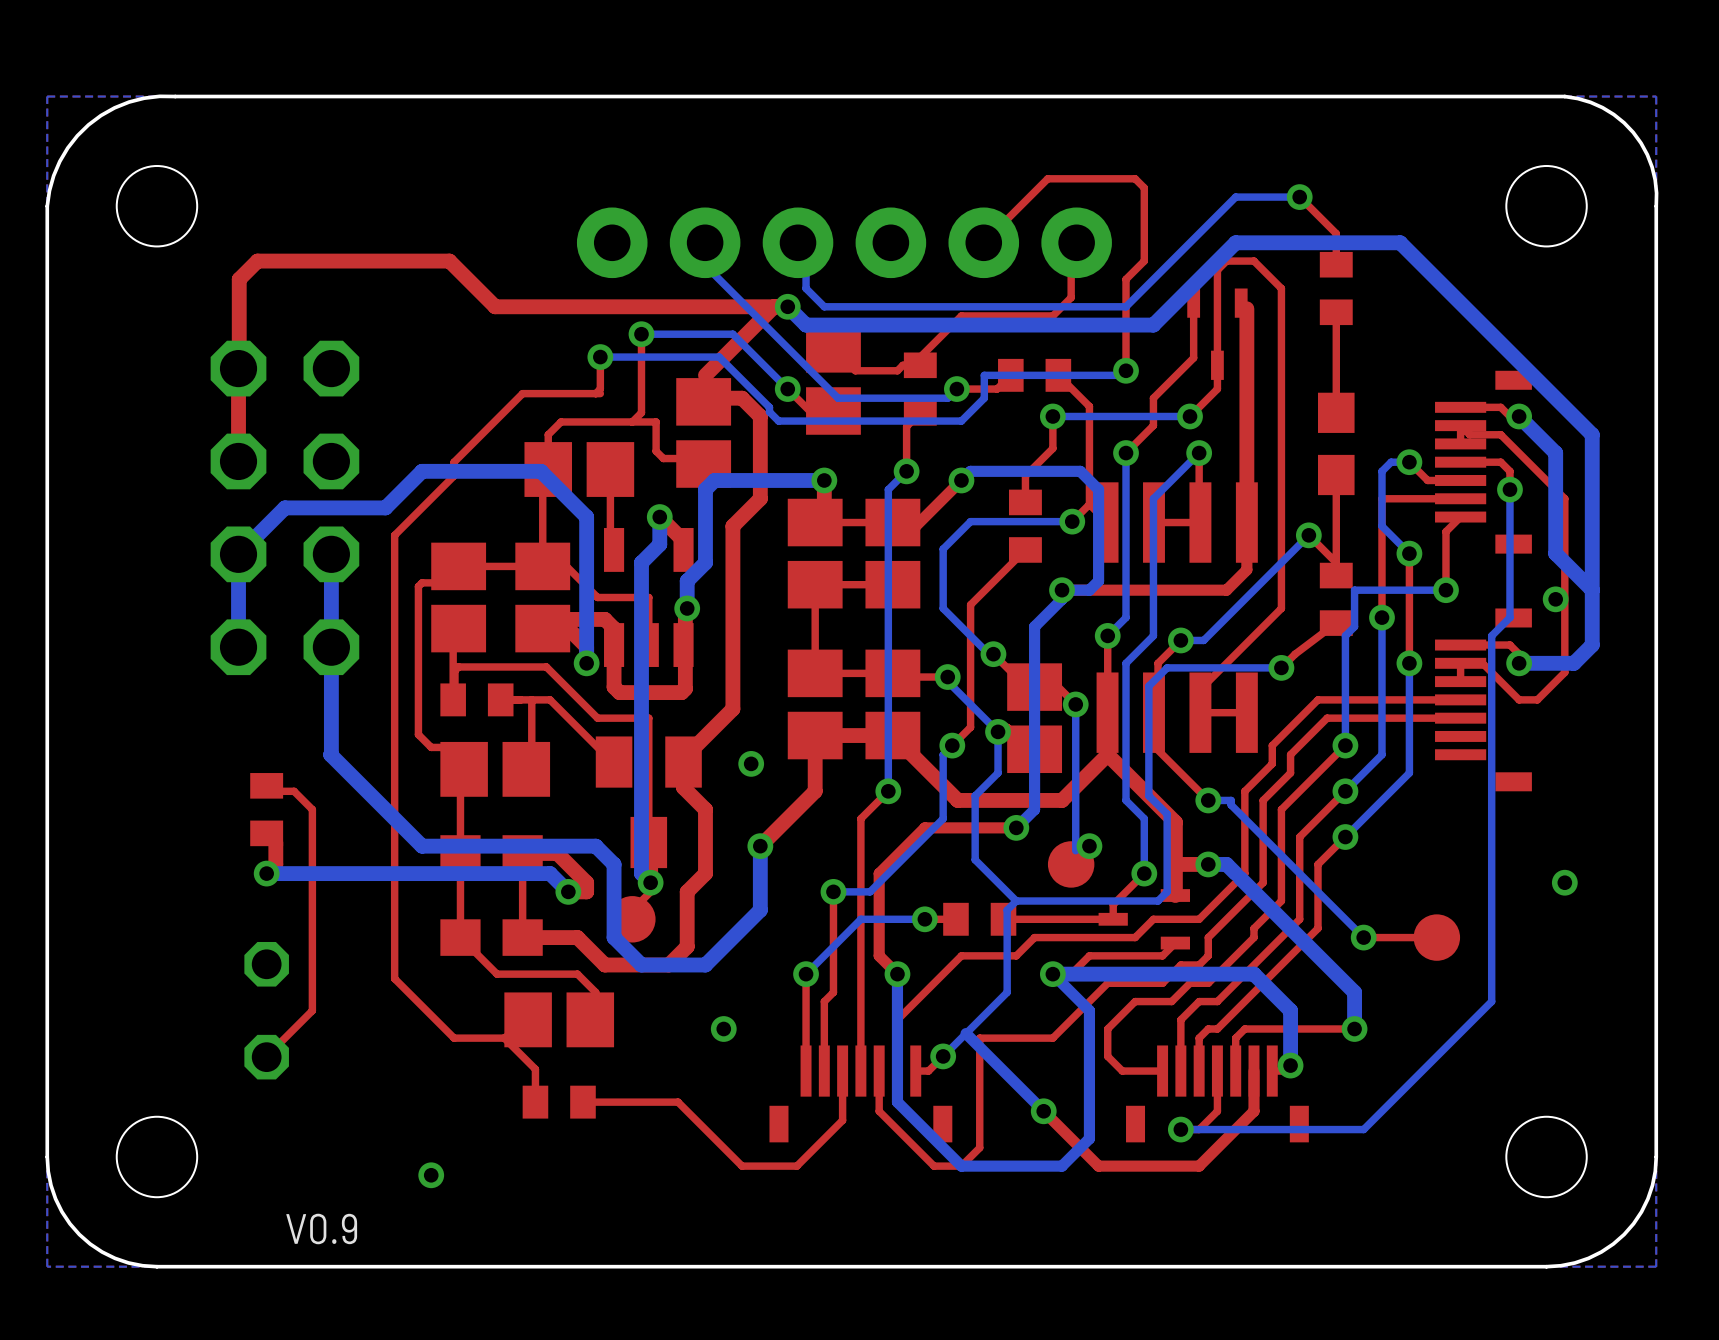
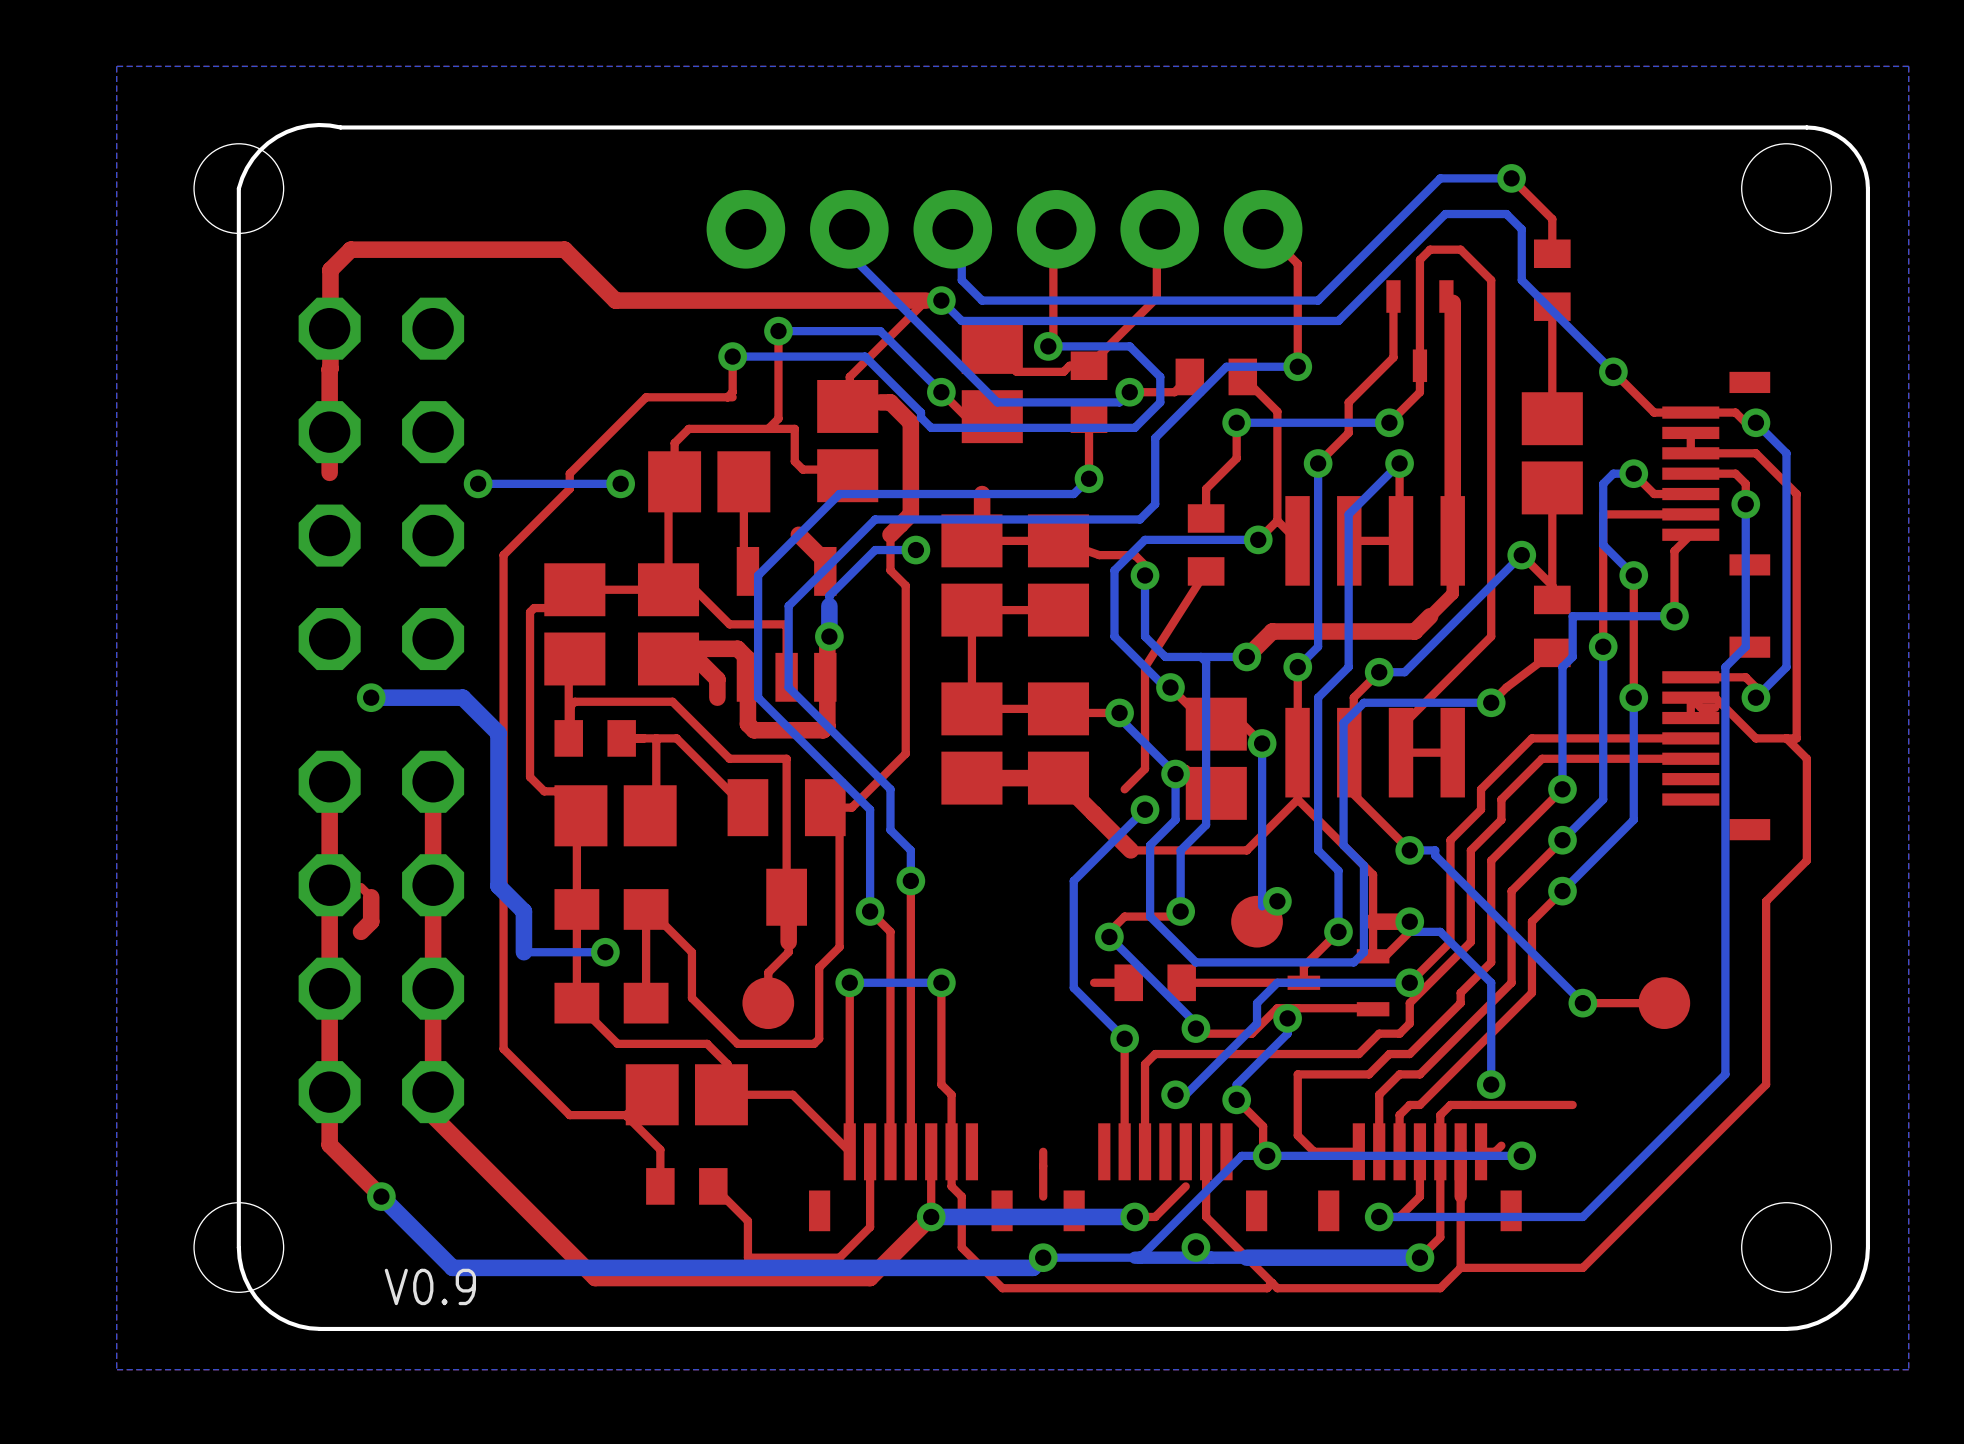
board edge: (1564, 96) (159, 96) (129, 102) (114, 107) (88, 124) (67, 148) (59, 161) (53, 175) (47, 206) (47, 1156) (51, 1185) (61, 1211) (69, 1223) (90, 1244) (102, 1251) (128, 1262) (156, 1266) (1546, 1266) (1574, 1262) (1601, 1251) (1613, 1244) (1633, 1223) (1641, 1211) (1652, 1185) (1656, 1156) (1656, 193) (1655, 179) (1647, 154) (1633, 132) (1613, 114) (1602, 107) (1590, 102) (1564, 96) -> (1806, 127) (1830, 132) (1850, 145) (1863, 165) (1867, 188) (1867, 1247) (1861, 1278) (1851, 1297) (1836, 1312) (1817, 1322) (1786, 1328) (320, 1328) (289, 1322) (270, 1312) (255, 1297) (245, 1278) (238, 1247) (238, 188) (252, 158) (268, 143) (297, 128) (318, 124) (340, 127) (1806, 127)
top track: none -> (1056, 229) (1053, 232) (1053, 341) (1048, 346)
top track: (983, 242) (1047, 178) (1135, 178) (1144, 187) (1144, 261) (1126, 279) (1126, 370) -> none
top track: (1076, 242) (1071, 248) (1071, 297) (1052, 315) (961, 315) (920, 357) (920, 365) -> (1159, 229) (1156, 232) (1156, 297) (1089, 365)
top track: none -> (1263, 229) (1297, 263) (1297, 366)
top track width: thick (787, 306) (774, 306) (705, 375) -> thin (941, 300) (926, 300) (849, 376)
bottom track width: thick (787, 306) (806, 325) (1144, 325) -> thin (941, 300) (961, 320) (1338, 320)
bottom track: (1144, 325) (1153, 325) (1235, 242) (1400, 242) (1592, 434) (1592, 645) (1573, 663) (1519, 663) -> (1338, 320) (1445, 214) (1506, 214) (1521, 229) (1521, 280) (1613, 371)
via: none -> (1048, 346)
bottom track: none -> (1297, 366) (1226, 366) (1155, 438) (1155, 504) (1139, 519) (875, 519) (788, 606) (788, 687) (890, 789) (890, 830) (910, 850) (910, 880)
bottom track: (1126, 370) (1121, 375) (984, 375) -> (1048, 346) (1129, 346) (1160, 376)
via position: (1126, 370) -> (1297, 366)
top track: none -> (1613, 371) (1654, 412) (1690, 412)
via: none -> (1613, 371)
part footprint: [1317, 392, 1355, 496] -> [1521, 392, 1583, 515]
top track: (920, 412) (906, 426) (906, 471) -> (1089, 418) (1089, 478)
bottom track width: thick (1519, 416) (1546, 443) -> thin (1755, 422) (1786, 453)
top track: (1460, 425) (1469, 434) (1500, 434) (1564, 498) (1564, 672) (1537, 699) -> (1690, 453) (1755, 453) (1796, 494) (1796, 738) (1776, 738)
bottom track: (1546, 443) (1555, 453) (1555, 553) (1592, 590) -> (1786, 453) (1786, 667) (1755, 697)
bottom track: none -> (1089, 478) (1073, 494) (982, 494)
via: none -> (478, 483)
bottom track: (422, 471) (385, 507) (284, 507) (238, 554) (238, 647) -> (534, 483) (478, 483)
bottom track: (499, 471) (540, 471) (586, 517) (586, 663) -> none
bottom track width: thick (499, 471) (422, 471) -> thin (620, 483) (534, 483)
via: none -> (620, 483)
bottom track: (906, 471) (888, 489) (888, 791) -> none
via position: (906, 471) -> (1089, 478)
bottom track: (714, 480) (705, 489) (705, 562) (687, 581) -> (915, 550) (875, 550) (829, 595) (829, 606)
bottom track: none -> (859, 494) (839, 494) (758, 575) (758, 697) (870, 809) (870, 911)
bottom track width: thick (824, 480) (714, 480) -> thin (982, 494) (859, 494)
via: (824, 480) -> none
top track: (961, 480) (915, 526) (896, 526) (892, 522) -> (1145, 575) (1145, 565) (1134, 555) (1099, 555) (1058, 540)
bottom track: (961, 480) (970, 471) (1080, 471) (1098, 489) (1098, 581) (1089, 590) (1062, 590) (1062, 599) (1034, 626) (1034, 809) (1016, 827) -> none
via: (961, 480) -> none
part position: (284, 507) -> (381, 483)
bottom track: (659, 517) (659, 544) (641, 562) (641, 873) (650, 882) -> none
via: (659, 517) -> none
top track: (742, 517) (732, 526) (732, 709) (683, 758) (683, 787) (705, 809) (705, 873) (687, 891) (687, 946) (668, 965) (604, 965) (577, 937) (522, 937) -> (890, 534) (890, 570) (905, 585) (905, 753) (851, 807) (825, 807) (839, 821) (839, 947) (819, 967) (819, 1038) (814, 1043) (737, 1043) (691, 998) (691, 952) (649, 909)
via: none -> (915, 550)
top track: (1025, 549) (970, 604) (970, 635) -> (1206, 571) (1145, 667)
bottom track: none -> (1145, 575) (1145, 636) (1165, 656) (1246, 656)
via: none -> (1145, 575)
bottom track: (331, 554) (331, 754) -> none
via position: (1062, 590) -> (1246, 656)
top track: (1226, 590) (1062, 590) -> (1430, 616) (1414, 631) (1272, 631) (1246, 656)
via: (1555, 599) -> none
bottom track: none -> (1201, 656) (1206, 662) (1206, 824) (1180, 850) (1180, 911)
bottom track: none -> (371, 697) (462, 697) (498, 733) (498, 886) (523, 911) (523, 952) (605, 952)
via: none -> (371, 697)
via: (586, 663) -> none
top track: none -> (1690, 697) (1700, 707) (1715, 707)
top track: none -> (1786, 738) (1806, 758) (1806, 860) (1766, 901) (1766, 1084) (1582, 1267) (1460, 1267)
top track: (815, 735) (815, 791) (760, 846) -> none
top track: none -> (329, 781) (329, 1144) (381, 1196)
top track: none -> (433, 781) (432, 1115) (595, 1278) (870, 1278) (931, 1216) (931, 1151)
bottom track: (952, 745) (943, 754) (943, 818) (870, 891) (833, 891) -> none
via position: (952, 745) -> (1145, 809)
bottom track: (330, 754) (422, 846) (595, 846) (614, 864) (614, 937) (641, 965) (705, 965) (760, 910) (760, 846) -> none
top track width: thick (1107, 754) (1175, 822) (1175, 895) -> thin (1297, 799) (1373, 874) (1373, 956)
top track width: thick (1107, 754) (1062, 800) (957, 800) -> thin (1297, 799) (1246, 850) (1130, 850)
via: (751, 763) -> none
bottom track: none -> (1145, 809) (1073, 880) (1073, 987) (1124, 1038)
top track: (266, 785) (272, 791) (294, 791) (312, 809) (312, 1010) (266, 1056) -> none
top track: (888, 791) (860, 818) (860, 1071) -> none
via: (888, 791) -> none
part: (266, 809) -> none
top track: none -> (910, 880) (910, 1151)
top track: (1016, 827) (924, 827) (879, 873) (879, 955) (897, 974) -> none
via position: (1016, 827) -> (1180, 911)
via position: (760, 846) -> (910, 880)
top track: (525, 853) (557, 853) (586, 882) (586, 891) (568, 891) -> none
top track: none -> (870, 911) (890, 931) (890, 1151)
via: none -> (870, 911)
top track: none -> (1180, 911) (1175, 916) (1124, 916) (1109, 931) (1109, 936)
bottom track: (1208, 864) (1226, 864) (1235, 873) -> none
bottom track: (266, 873) (550, 873) (568, 891) -> none
via: (266, 873) -> none
top track: none -> (1409, 931) (1385, 956)
bottom track: none -> (1409, 931) (1440, 931) (1445, 936)
top track: (1244, 873) (1199, 919) (1153, 919) (1135, 937) (1034, 937) (1016, 955) (961, 955) (897, 1019) (897, 1071) -> (1450, 931) (1450, 942) (1409, 982)
part: none -> (381, 936)
bottom track: none -> (1109, 936) (1195, 1023) (1195, 1028)
via: none -> (1109, 936)
bottom track width: thick (1240, 878) (1281, 919) -> thin (1445, 936) (1491, 982)
via: (650, 882) -> none
via: (1564, 882) -> none
via: none -> (605, 952)
via: (568, 891) -> none
top track: (833, 891) (833, 992) (824, 1001) (824, 1071) -> none
via: (833, 891) -> none
bottom track: (1016, 901) (1007, 910) (1007, 992) (943, 1056) -> none
part position: (632, 919) -> (768, 1003)
top track: none -> (849, 982) (849, 1151) (792, 1094) (721, 1094)
via: none -> (849, 982)
top track: none -> (941, 982) (941, 1084) (951, 1094) (951, 1186) (961, 1196) (961, 1247) (1002, 1288) (1267, 1288) (1272, 1283)
bottom track: none -> (941, 982) (849, 982)
via: none -> (941, 982)
bottom track: (924, 919) (860, 919) (806, 974) -> none
via: (924, 919) -> none
bottom track: none -> (1409, 982) (1277, 982) (1257, 1003) (1257, 1023) (1185, 1094) (1175, 1094)
via: none -> (1409, 982)
bottom track: (1281, 919) (1354, 992) (1354, 1028) -> (1491, 982) (1491, 1084)
top track: (1175, 943) (1162, 955) (1089, 955) (1071, 974) (1052, 974) -> (1373, 1009) (1277, 1008) (1251, 1033) (1201, 1033) (1195, 1028)
bottom track: none -> (1287, 1018) (1287, 1033) (1236, 1084) (1236, 1099)
via: none -> (1287, 1018)
via: none -> (1195, 1028)
top track: none -> (1124, 1038) (1124, 1151)
via: none -> (1124, 1038)
top track: (806, 974) (806, 1071) -> none
via: (806, 974) -> none
bottom track: (897, 974) (897, 1102) (961, 1166) -> (381, 1196) (452, 1267) (1033, 1267) (1043, 1257) (1134, 1257)
via: (897, 974) -> none
via: (1052, 974) -> none
top track: (1107, 983) (1052, 1038) (979, 1038) (979, 1147) (961, 1166) (934, 1166) (879, 1111) -> (1297, 1054) (1155, 1054) (1145, 1064) (1145, 1151)
top track: (1135, 1001) (1107, 1028) -> (1328, 1074) (1297, 1074) (1297, 1104)
part: (266, 1010) -> none
via: none -> (1491, 1084)
via: none -> (1175, 1094)
top track: none -> (1236, 1099) (1263, 1126) (1263, 1151) (1267, 1155)
via: none -> (1236, 1099)
via: (723, 1028) -> none
via: (1354, 1028) -> none
bottom track: (966, 1033) (1043, 1111) -> none
top track: (943, 1056) (928, 1071) (915, 1071) -> none
via: (943, 1056) -> none
bottom track: (1290, 1065) (1290, 1010) (1254, 974) (1052, 974) (1089, 1010) (1089, 1138) (1062, 1166) -> (1419, 1257) (1246, 1257)
via position: (1290, 1065) -> (1521, 1155)
top track: (842, 1071) (842, 1120) (796, 1166) (742, 1166) (678, 1102) (582, 1102) -> (870, 1151) (870, 1227) (839, 1257) (747, 1257) (747, 1221) (713, 1186)
top track: none -> (1206, 1151) (1206, 1216) (1277, 1288) (1440, 1288) (1460, 1267)
top track: none -> (1440, 1151) (1440, 1237) (1419, 1257)
via: none -> (1267, 1155)
bottom track: none -> (1521, 1155) (1241, 1155) (1139, 1257)
part: none -> (910, 1177)
part: (860, 1093) -> none
part: none -> (1165, 1177)
top track: none -> (1185, 1186) (1155, 1216) (1134, 1216)
via: none -> (381, 1196)
via: (1043, 1111) -> none
top track: (1254, 1111) (1199, 1166) (1098, 1166) (1043, 1111) -> (1460, 1196) (1460, 1267)
via: none -> (931, 1216)
bottom track: none -> (1134, 1216) (931, 1216)
via: none -> (1134, 1216)
via: none -> (1195, 1247)
via: none -> (1043, 1257)
via: none -> (1419, 1257)
via: (431, 1175) -> none
text position: V0.9 (321, 1228) -> V0.9 (430, 1286)

